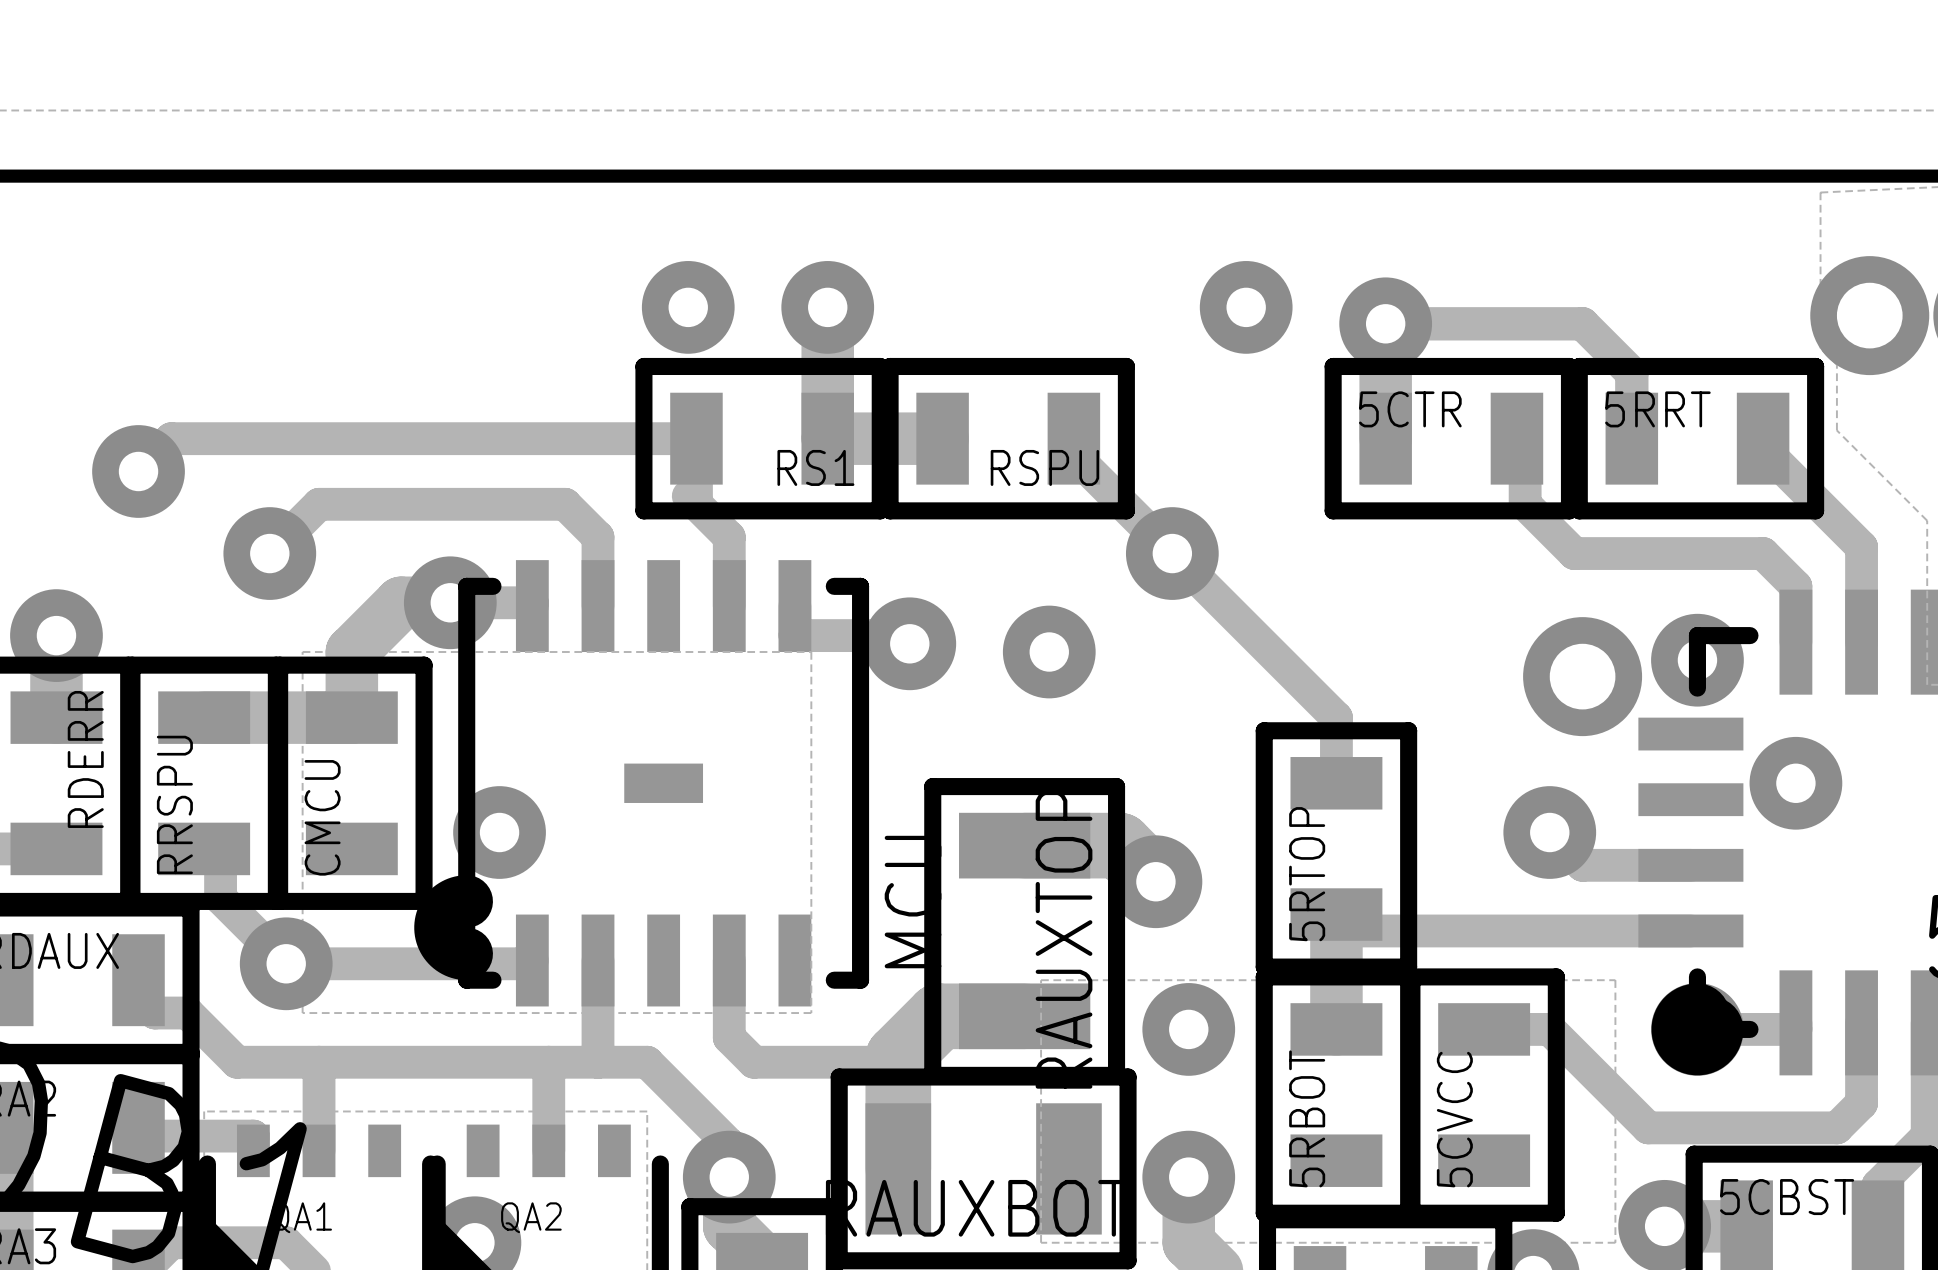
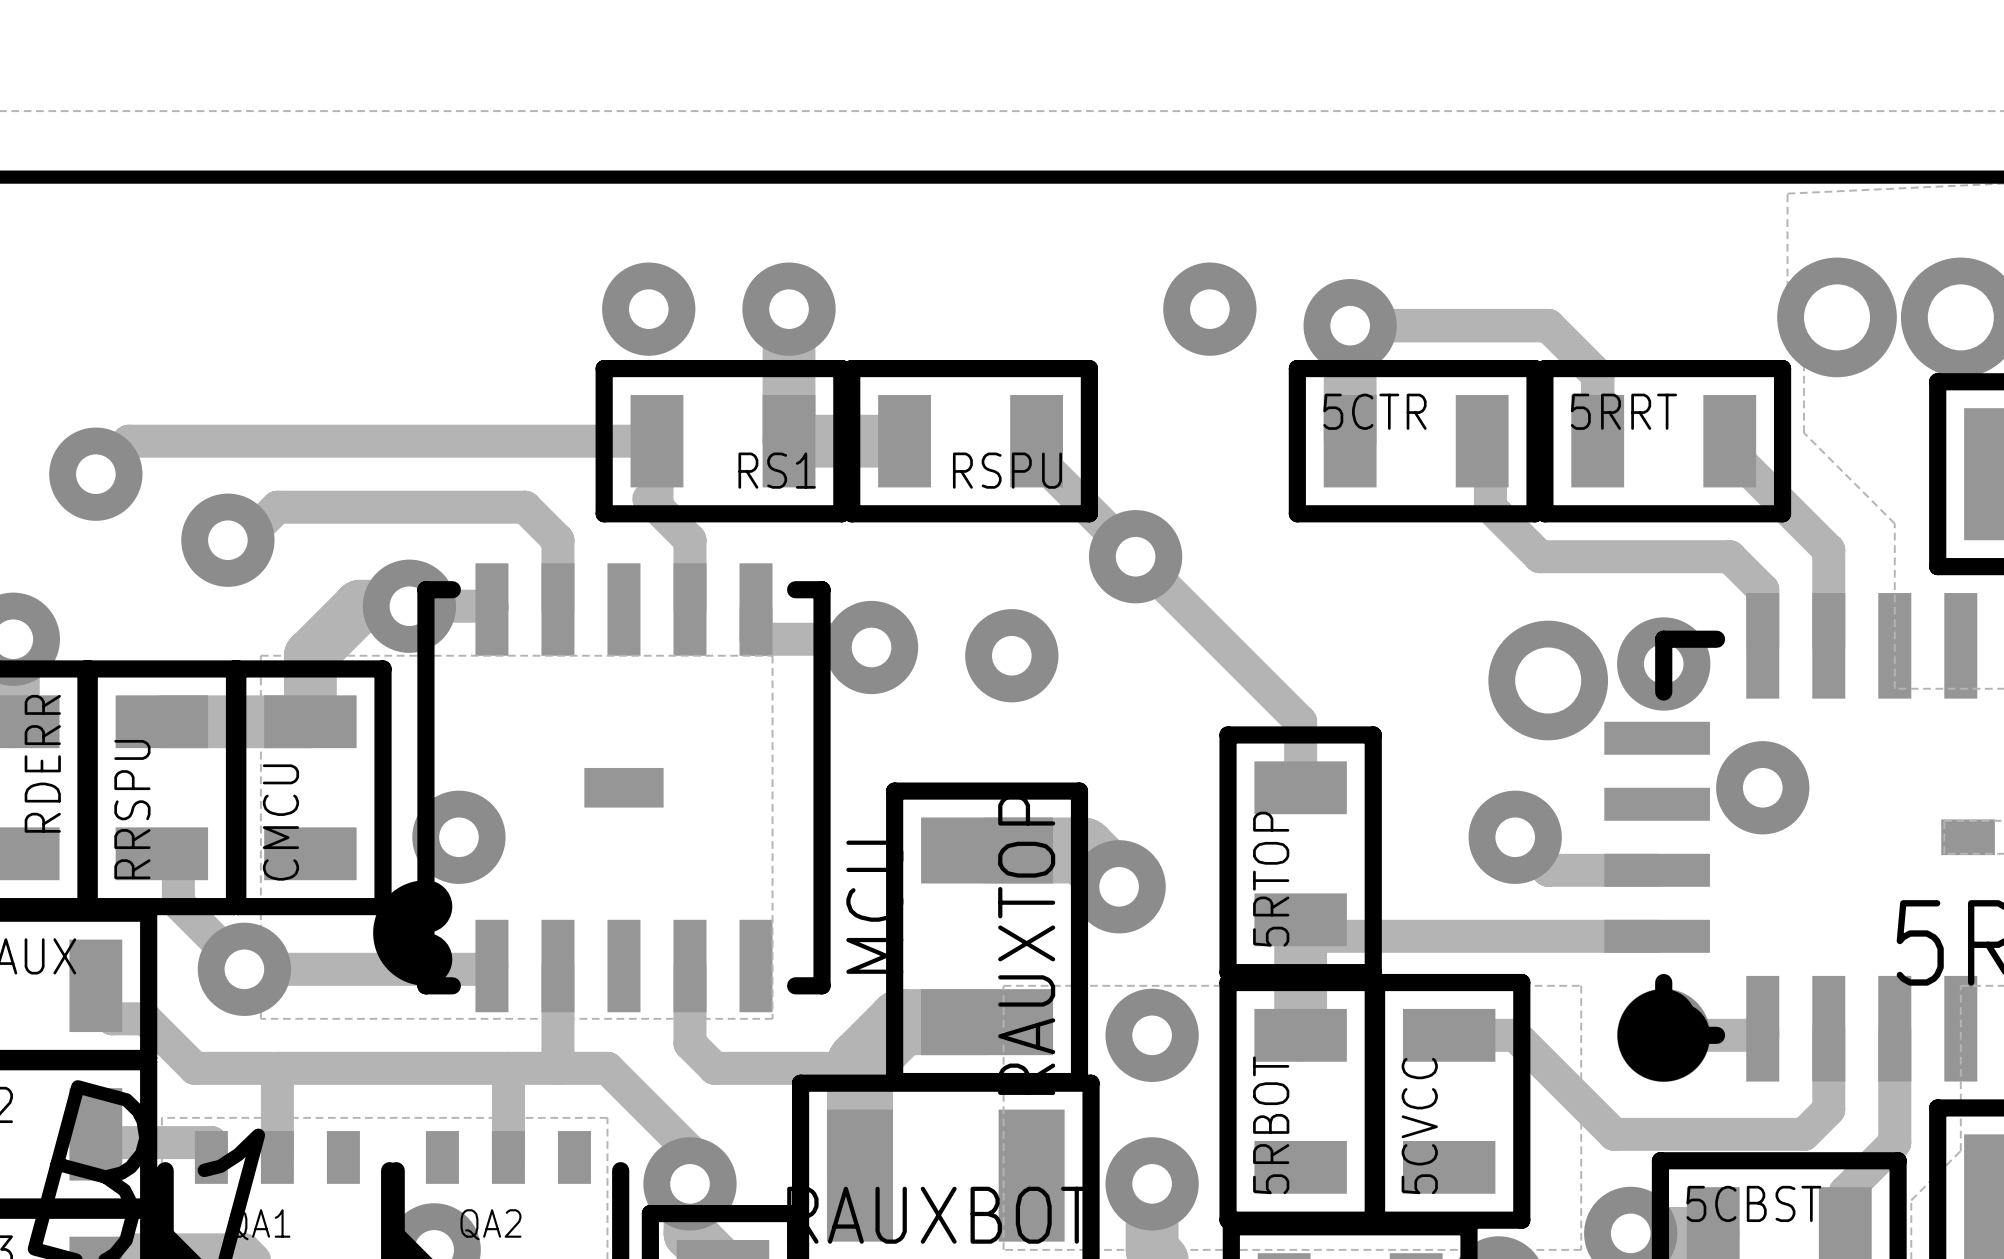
via position: (269, 553) -> (227, 540)

